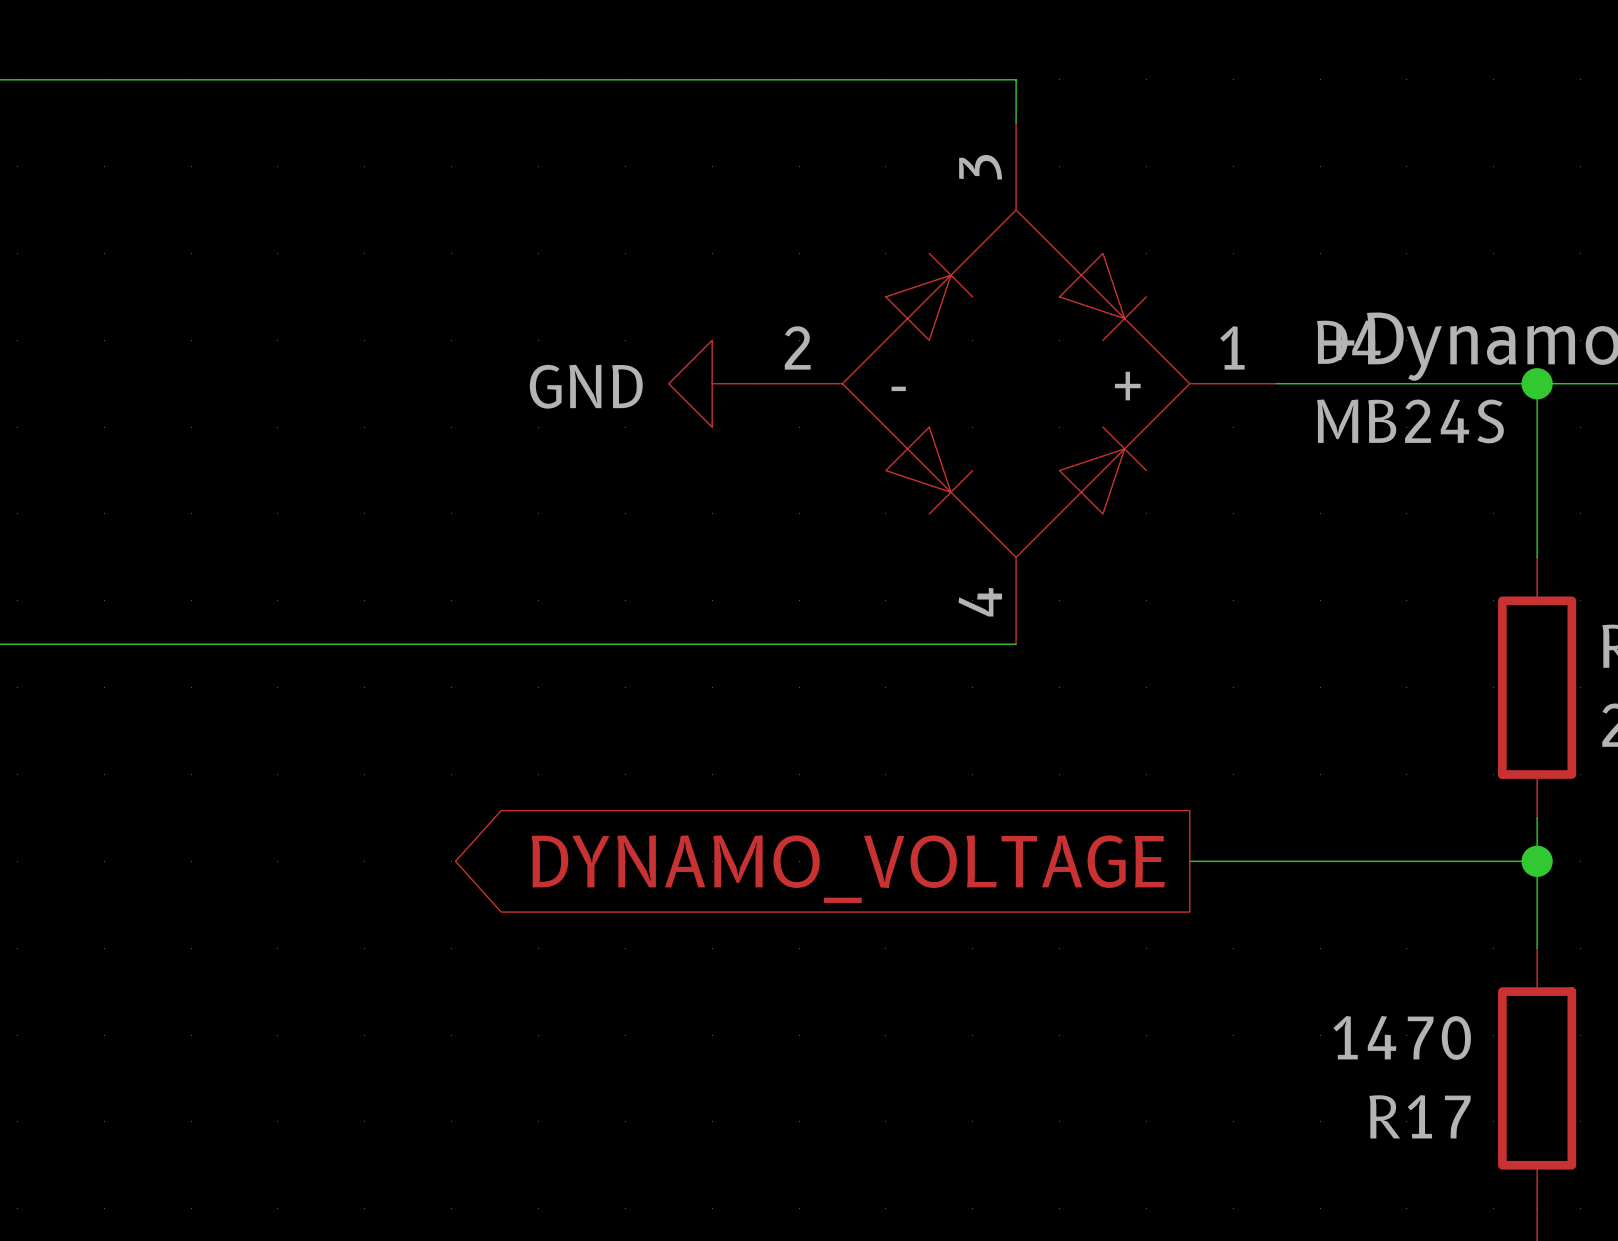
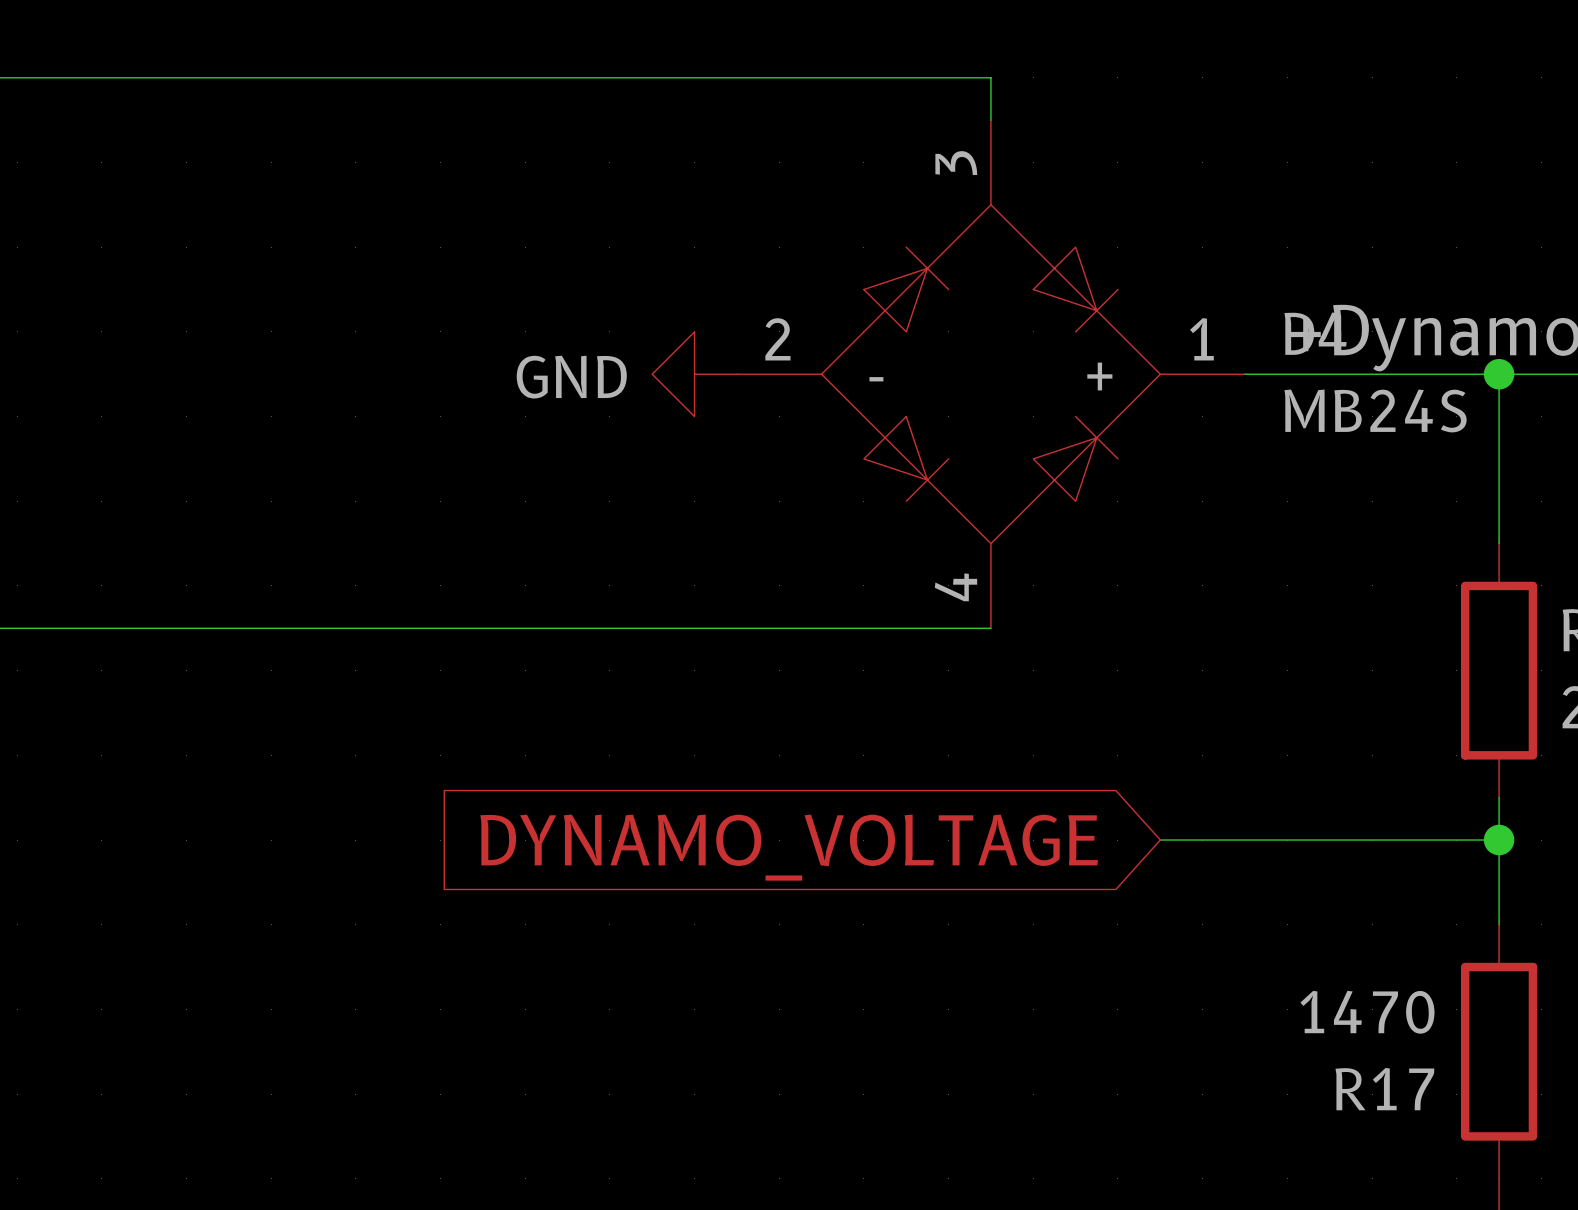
global label shape: output (848, 869) -> input (789, 847)

